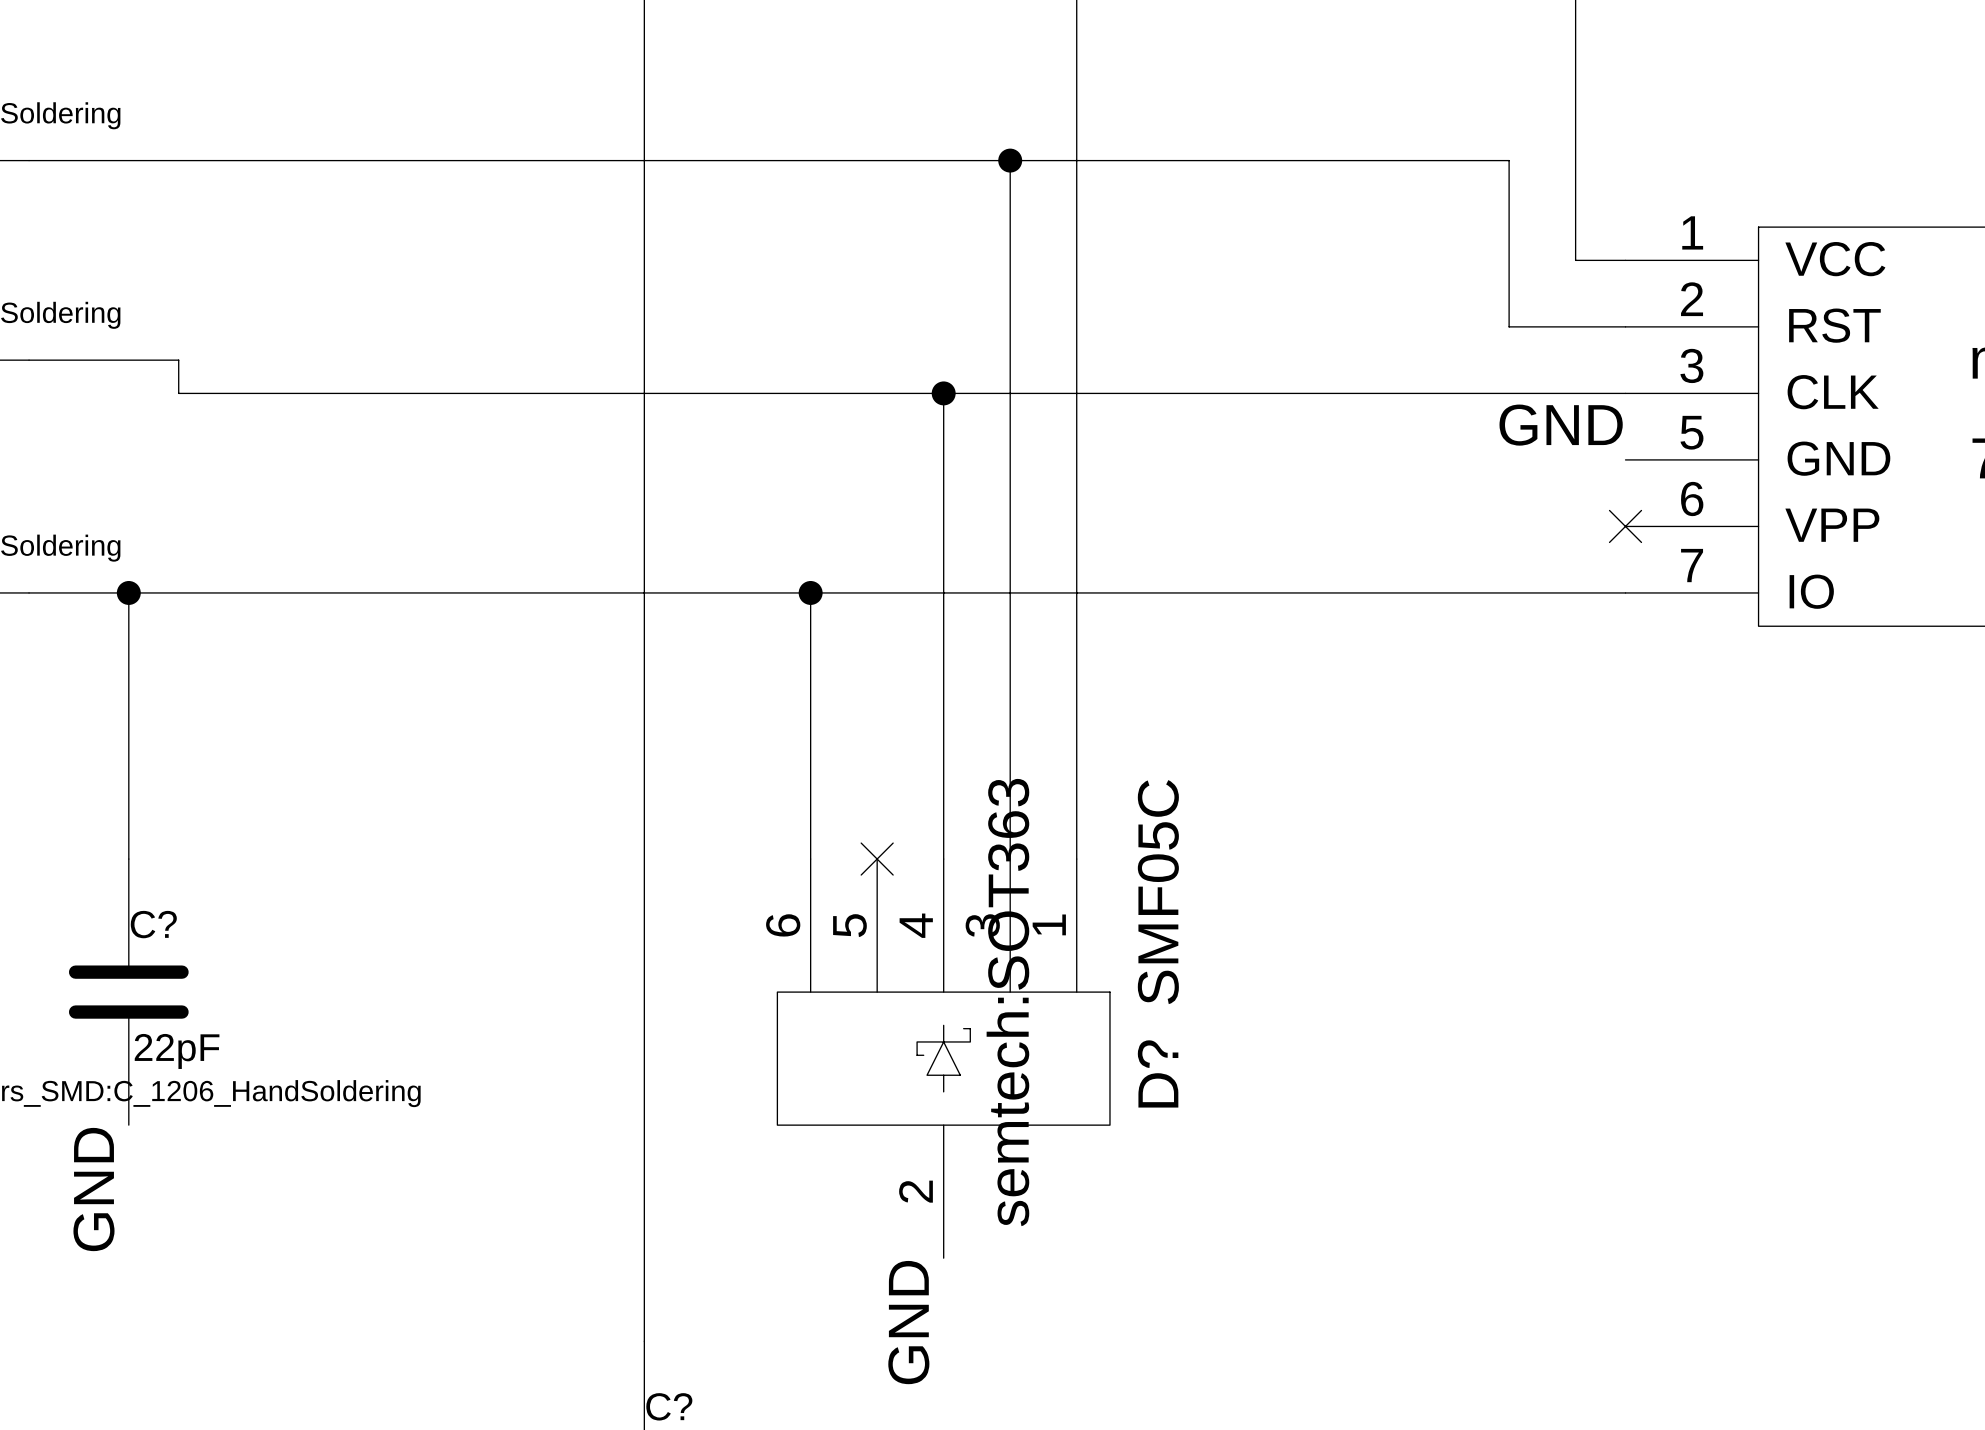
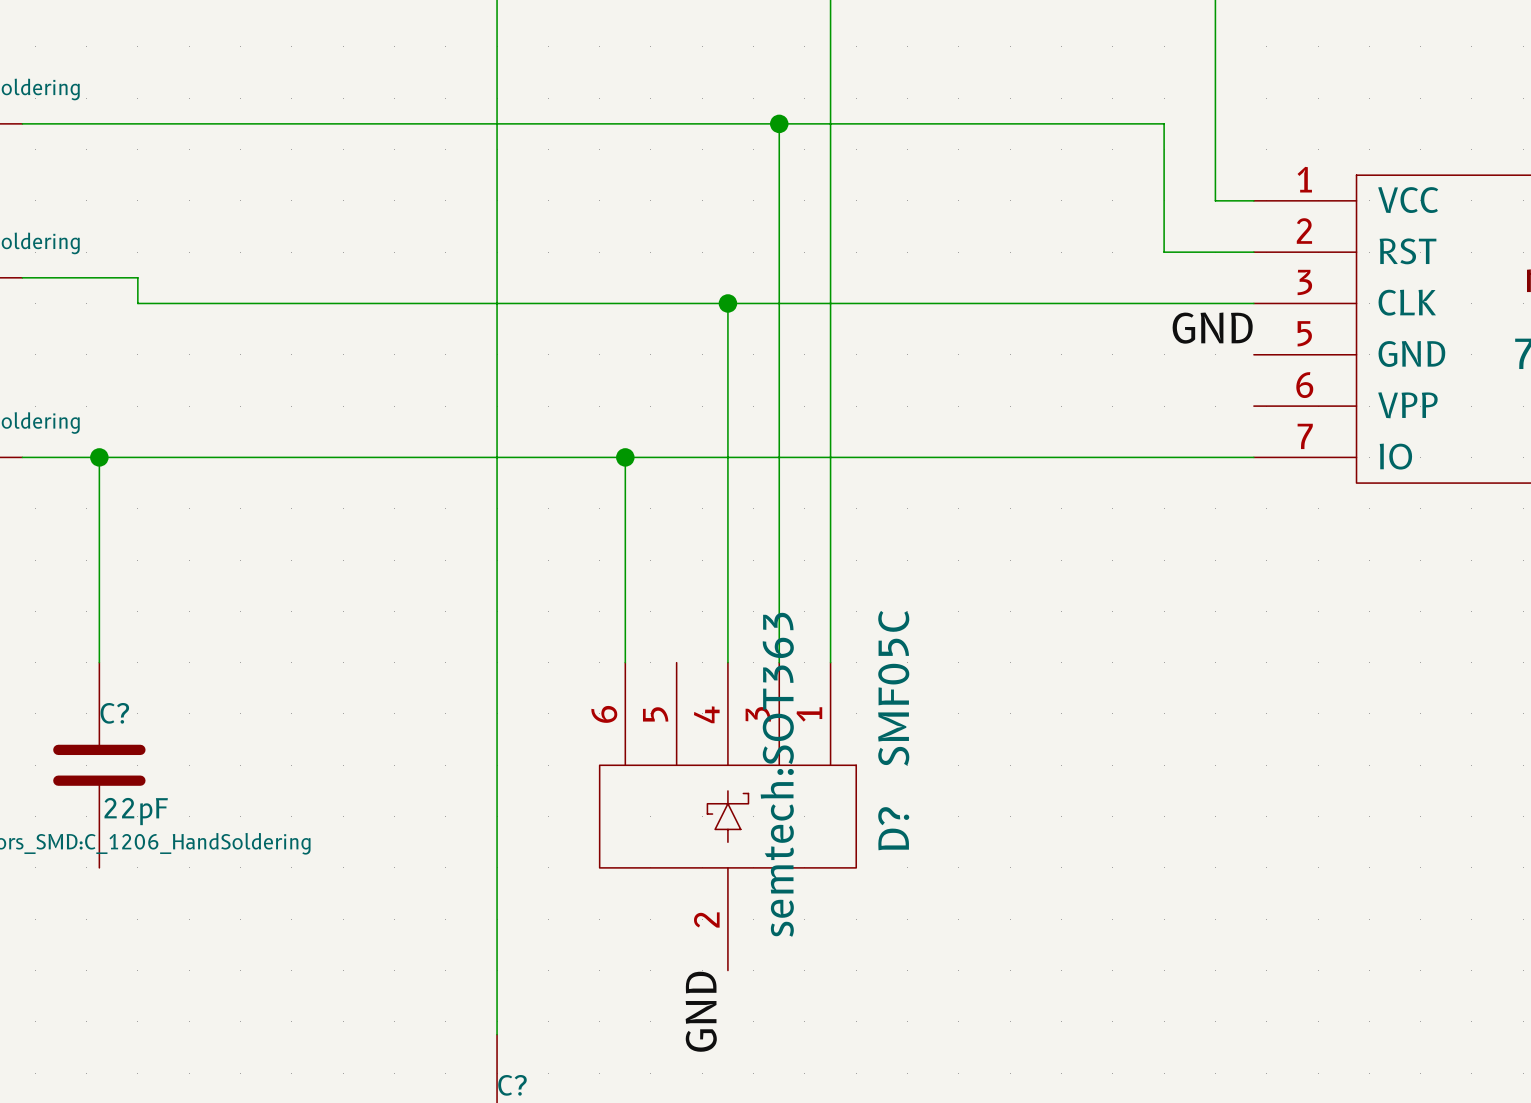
no-connect mark: (1625, 526) -> none
no-connect mark: (877, 859) -> none
label: GND (93, 1189) -> none

